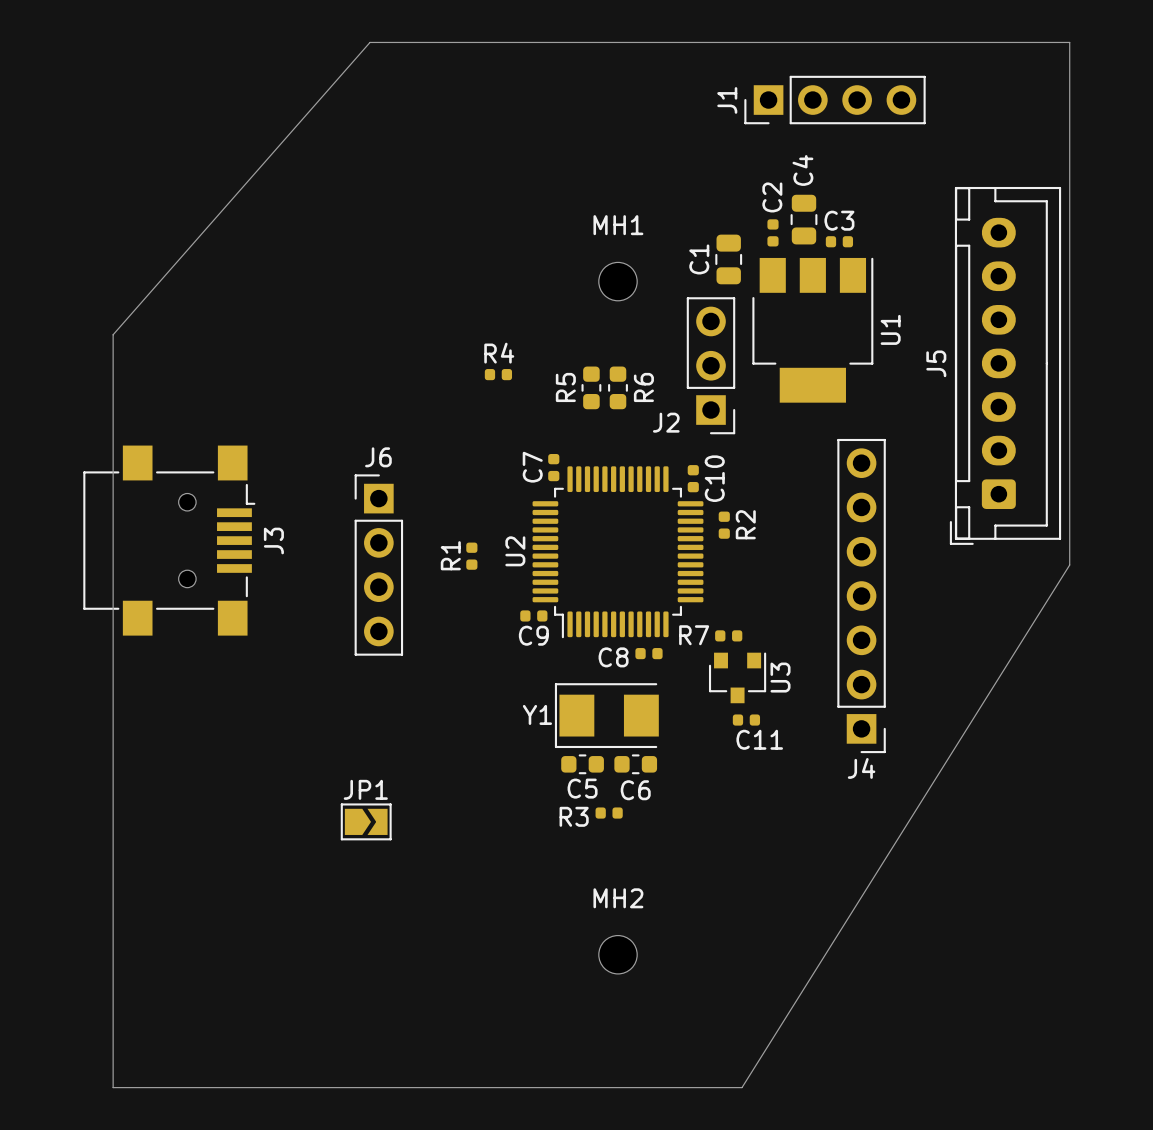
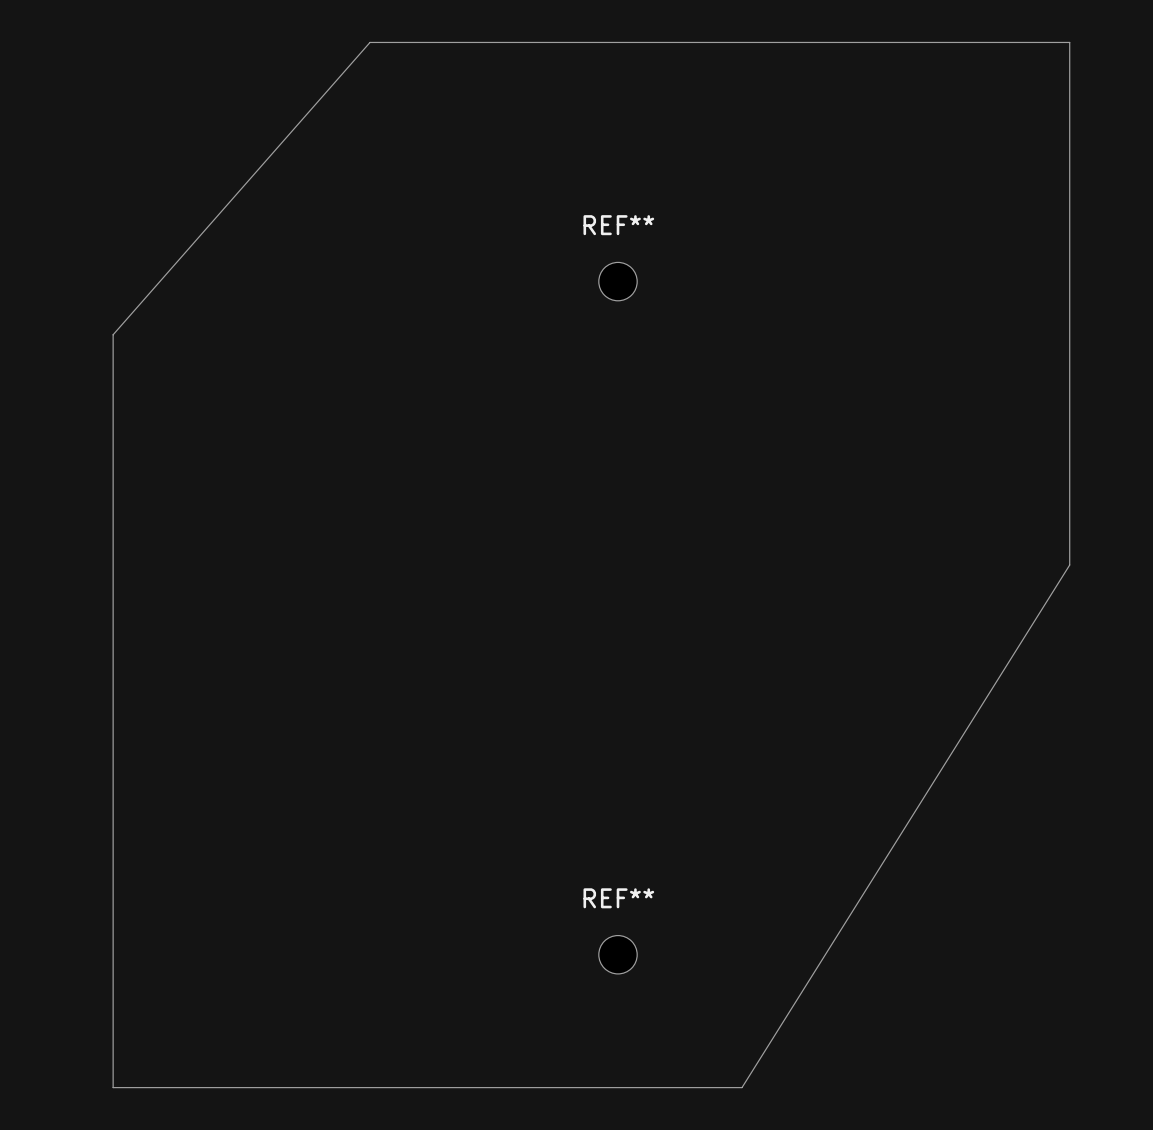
J1: (835, 100) -> none
C4: (804, 219) -> none
MH1 name: MH1 (618, 225) -> REF** (618, 225)
C2: (773, 232) -> none
C3: (839, 241) -> none
C1: (728, 259) -> none
U1: (812, 330) -> none
J2: (711, 365) -> none
J5: (1005, 365) -> none
R4: (498, 374) -> none
R5: (591, 387) -> none
R6: (617, 387) -> none
C7: (553, 467) -> none
C10: (693, 478) -> none
R2: (724, 525) -> none
J3: (169, 540) -> none
U2: (617, 552) -> none
R1: (471, 556) -> none
J6: (378, 565) -> none
J4: (861, 596) -> none
C9: (533, 615) -> none
R7: (728, 635) -> none
C8: (648, 653) -> none
U3: (737, 677) -> none
Y1: (606, 715) -> none
C11: (746, 720) -> none
C5: (582, 764) -> none
C6: (635, 764) -> none
R3: (609, 813) -> none
JP1: (366, 821) -> none
MH2 name: MH2 (618, 898) -> REF** (618, 898)

